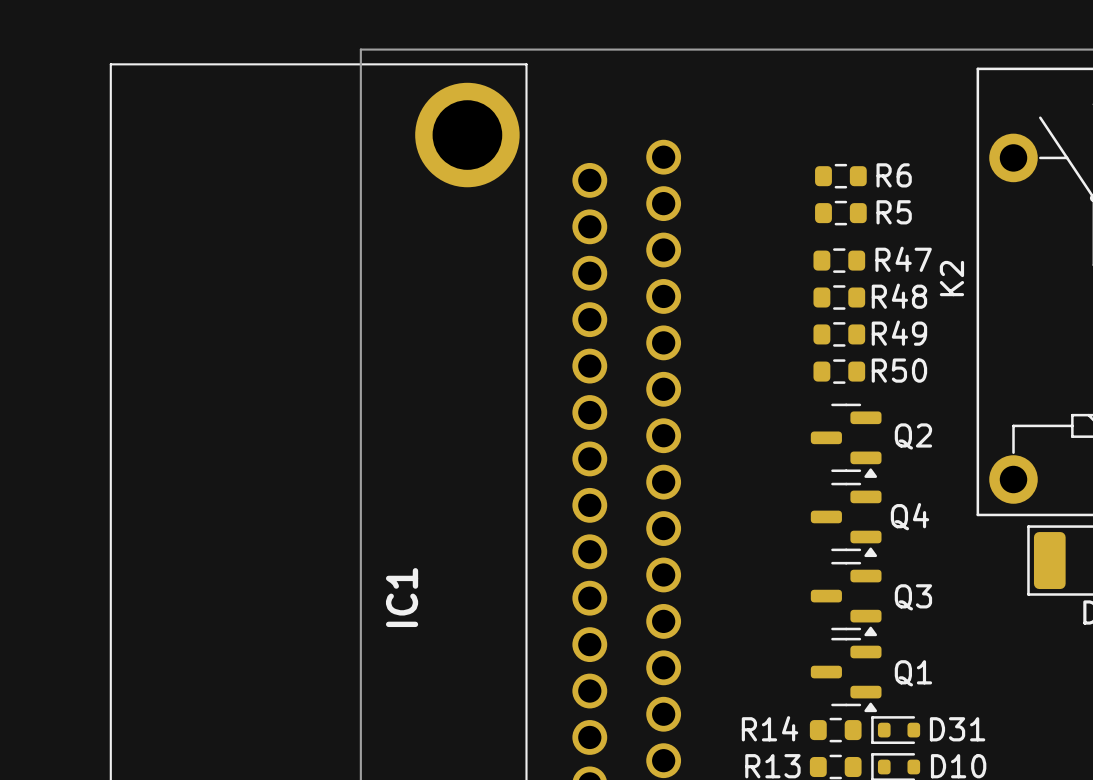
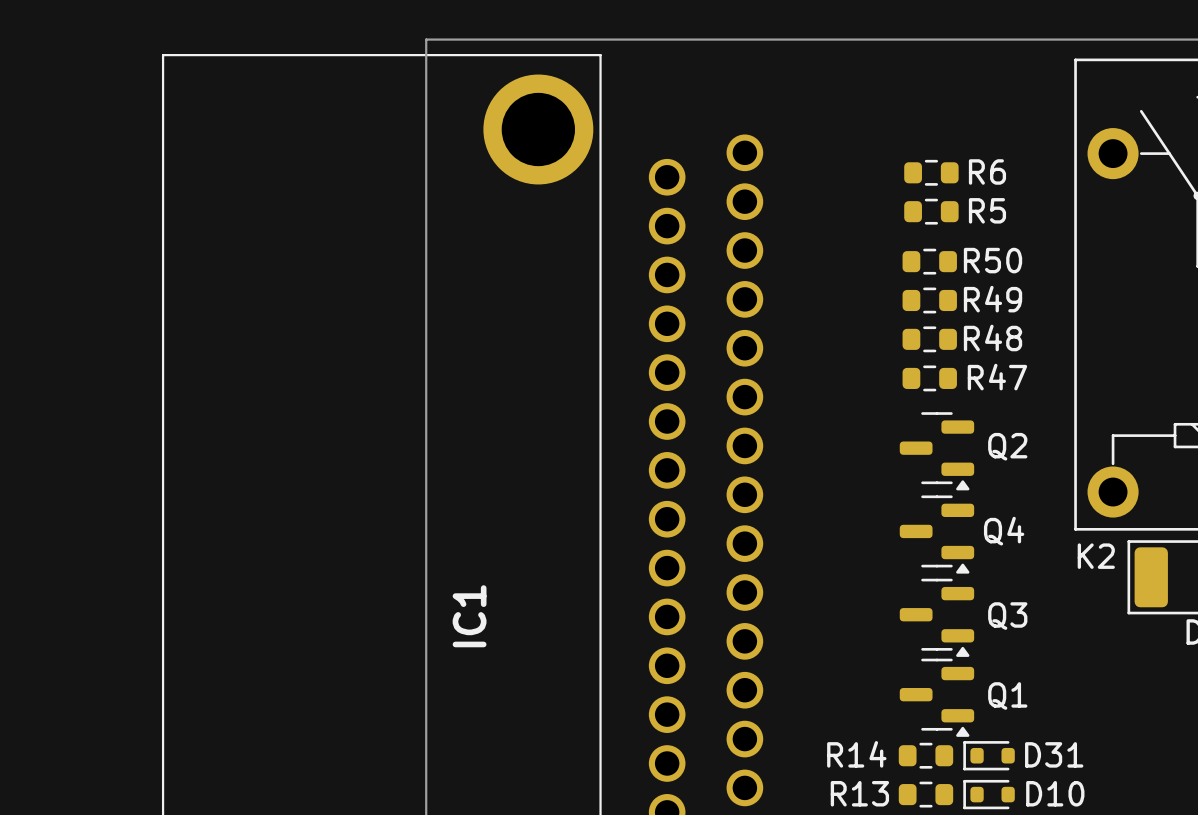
R47 name: R47 (903, 259) -> R50 (993, 260)
K2 name rotation: 0° (951, 278) -> 90° clockwise (1096, 556)
K2 name position: K2 (951, 278) -> K2 (1096, 556)
R48 name: R48 (899, 296) -> R49 (993, 299)
R49 name: R49 (899, 333) -> R48 (993, 337)
R50 name: R50 (899, 370) -> R47 (997, 377)

